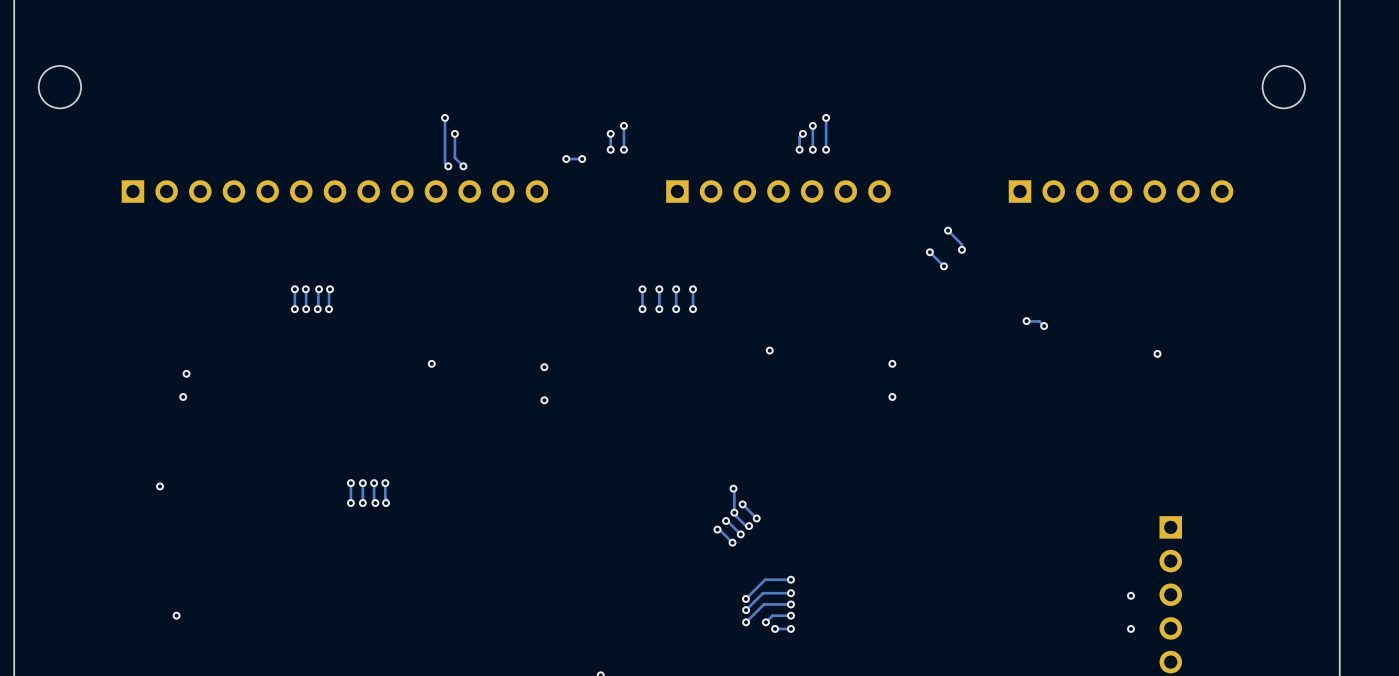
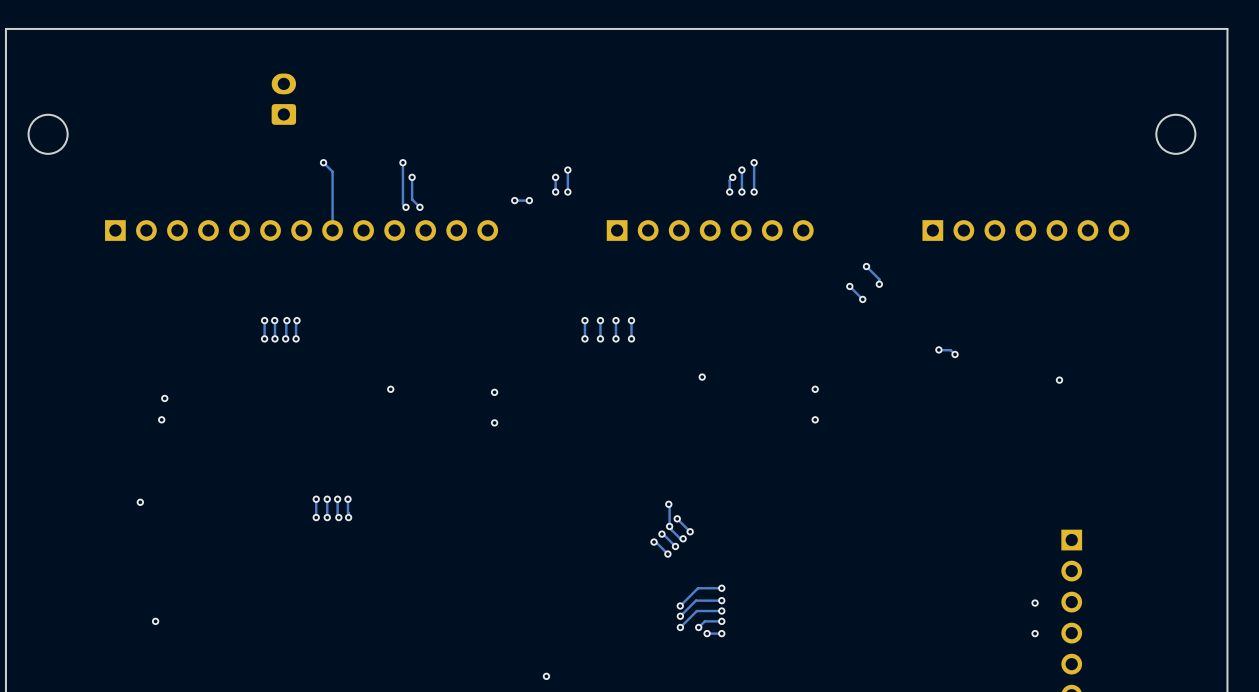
part: none -> (283, 99)
track: none -> (323, 162) (332, 171) (332, 230)
via: none -> (323, 162)

